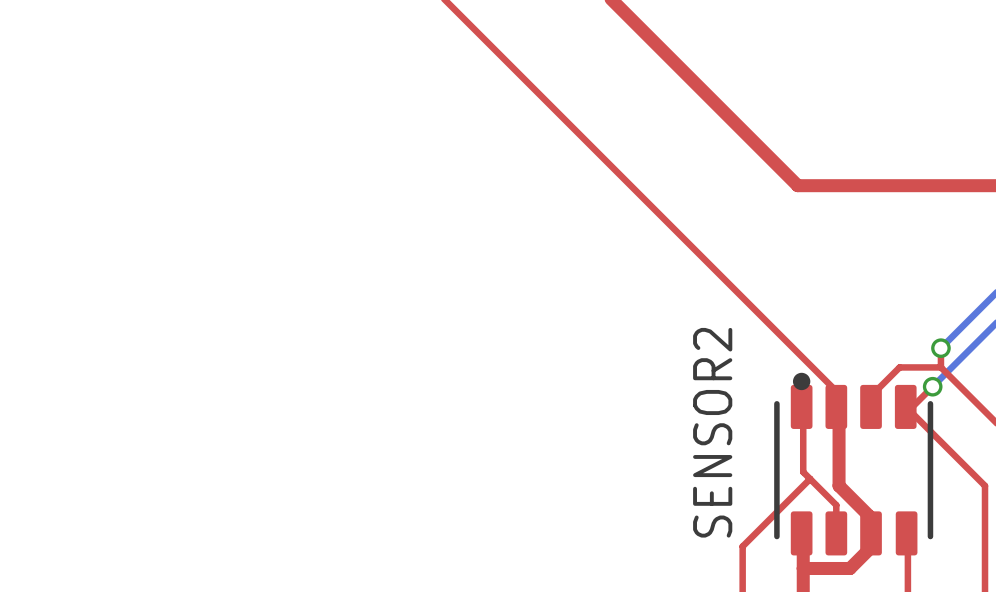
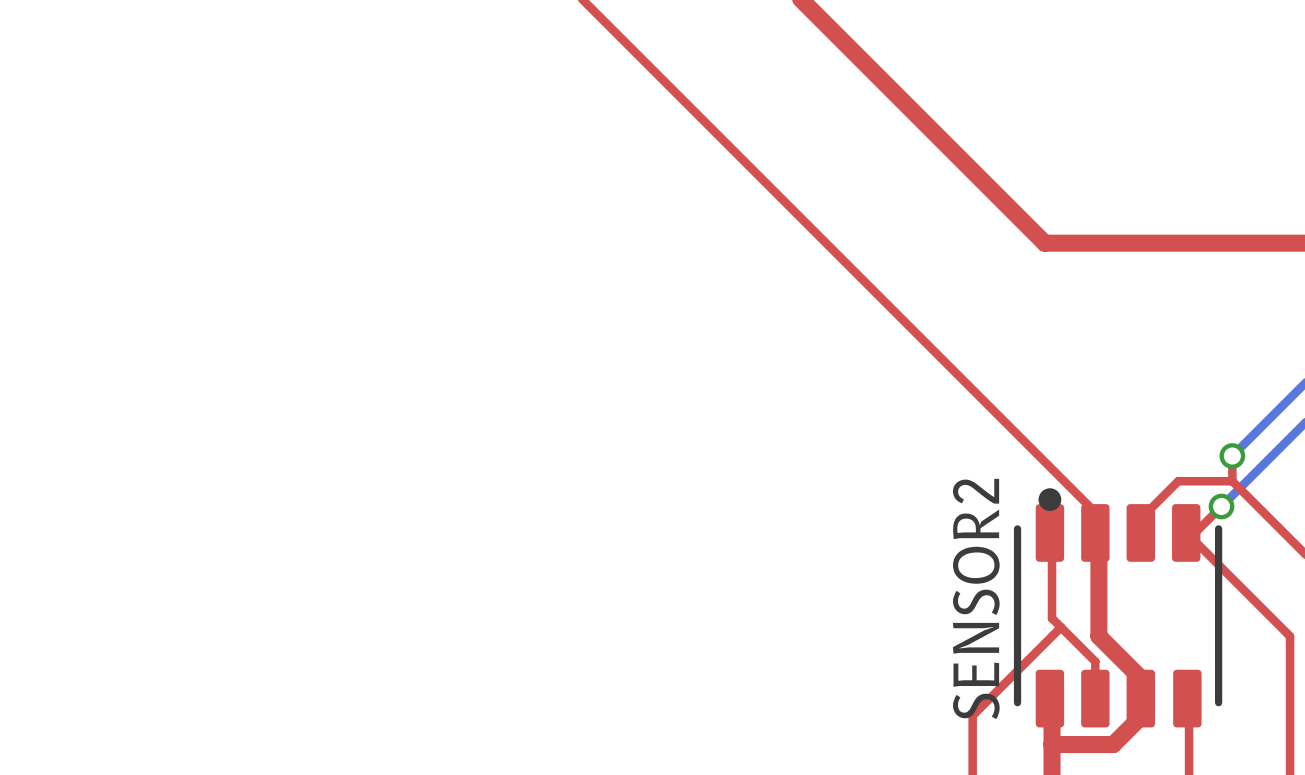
SENSOR2 name position: SENSOR2 (712, 432) -> SENSOR2 (976, 598)

